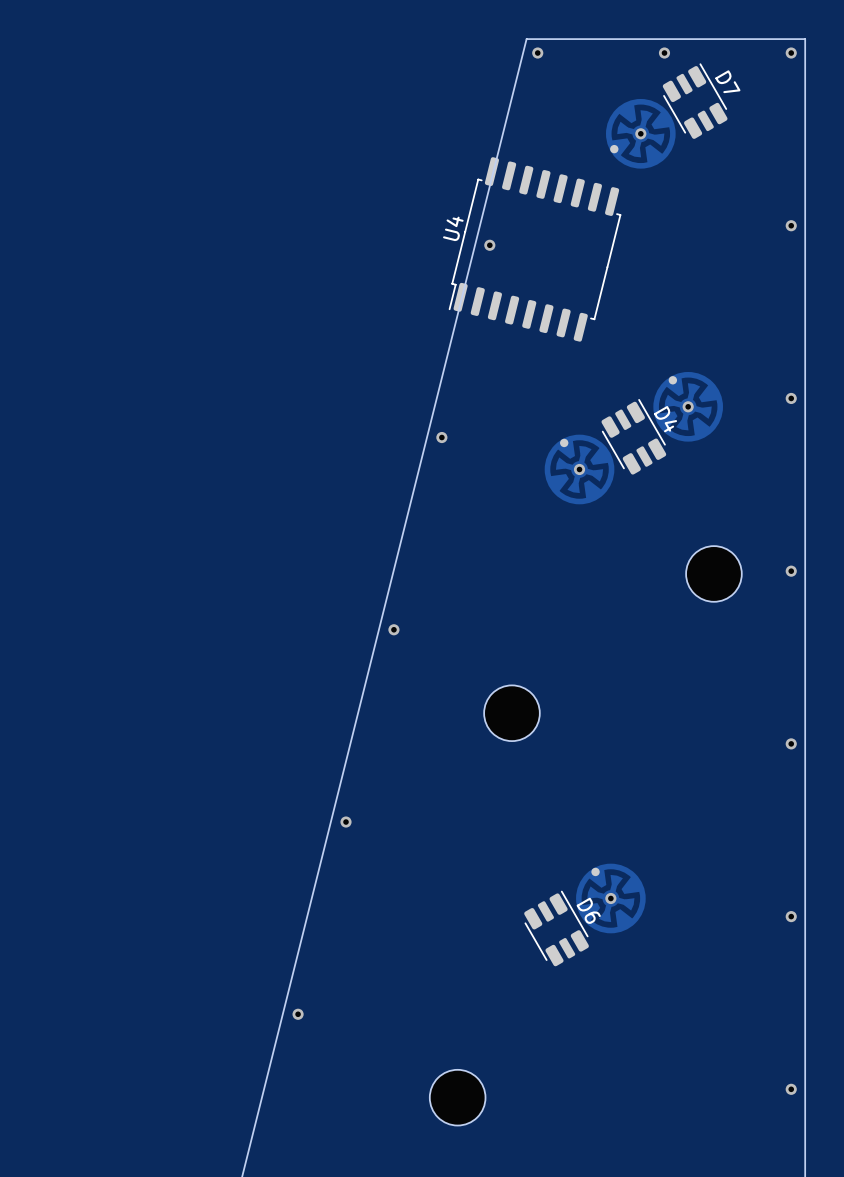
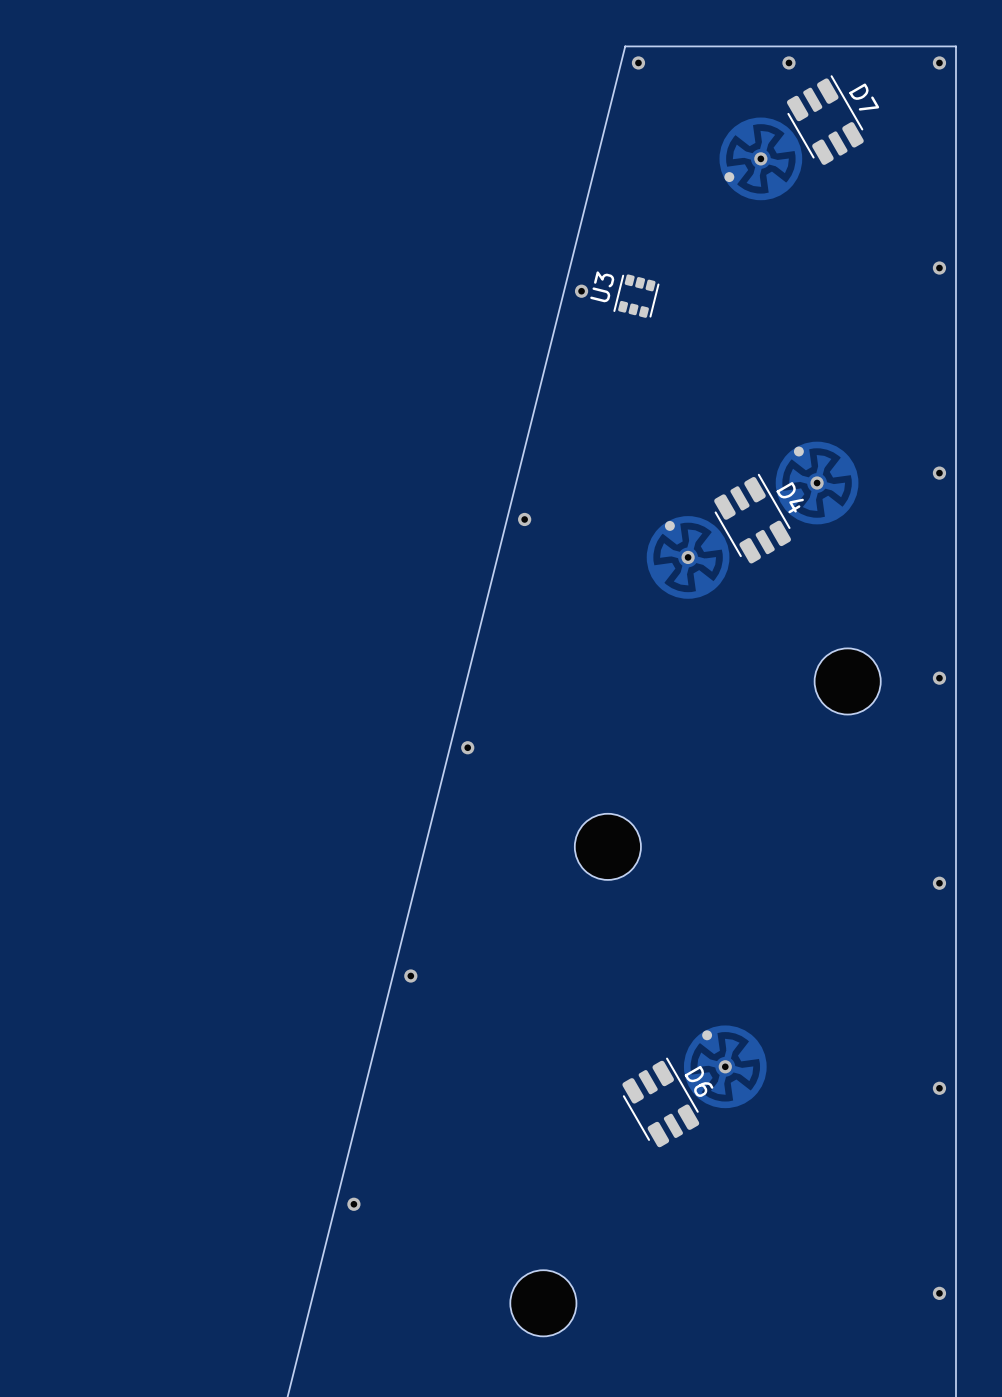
U4: (535, 249) -> none
U3: none -> (636, 296)

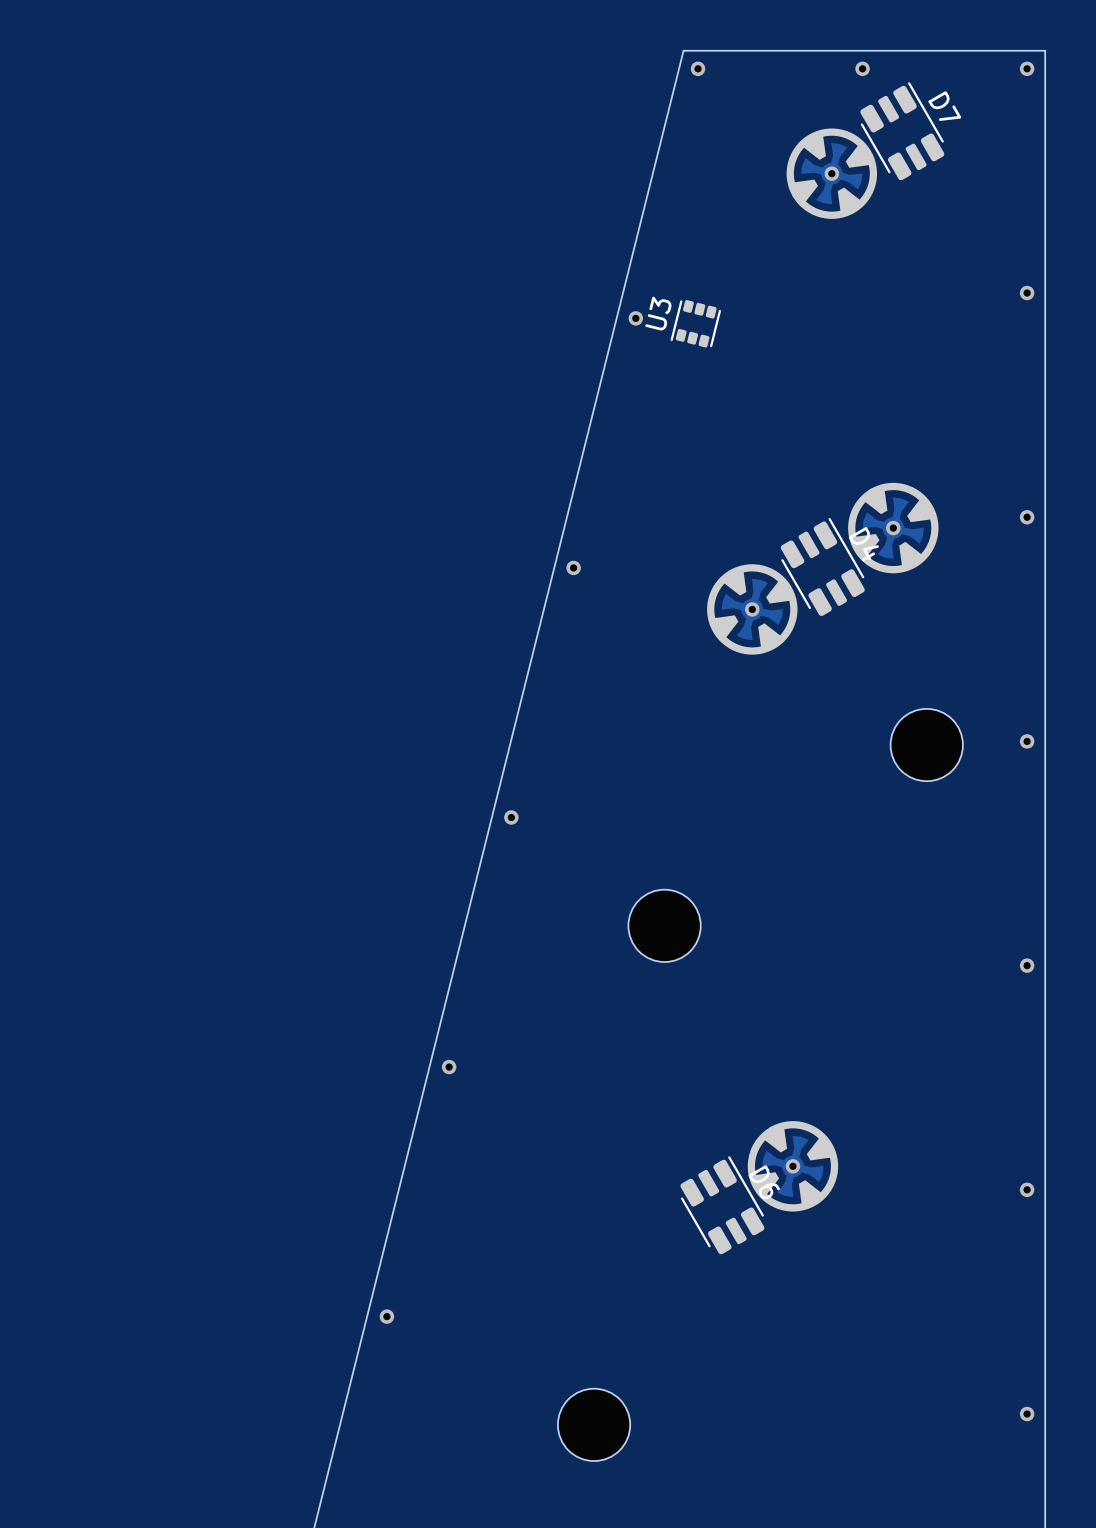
part footprint: [719, 117, 803, 201] -> [786, 128, 878, 219]
part footprint: [775, 441, 859, 525] -> [848, 482, 939, 574]
part footprint: [646, 516, 730, 599] -> [707, 564, 798, 655]
part footprint: [683, 1025, 767, 1109] -> [747, 1121, 839, 1212]

